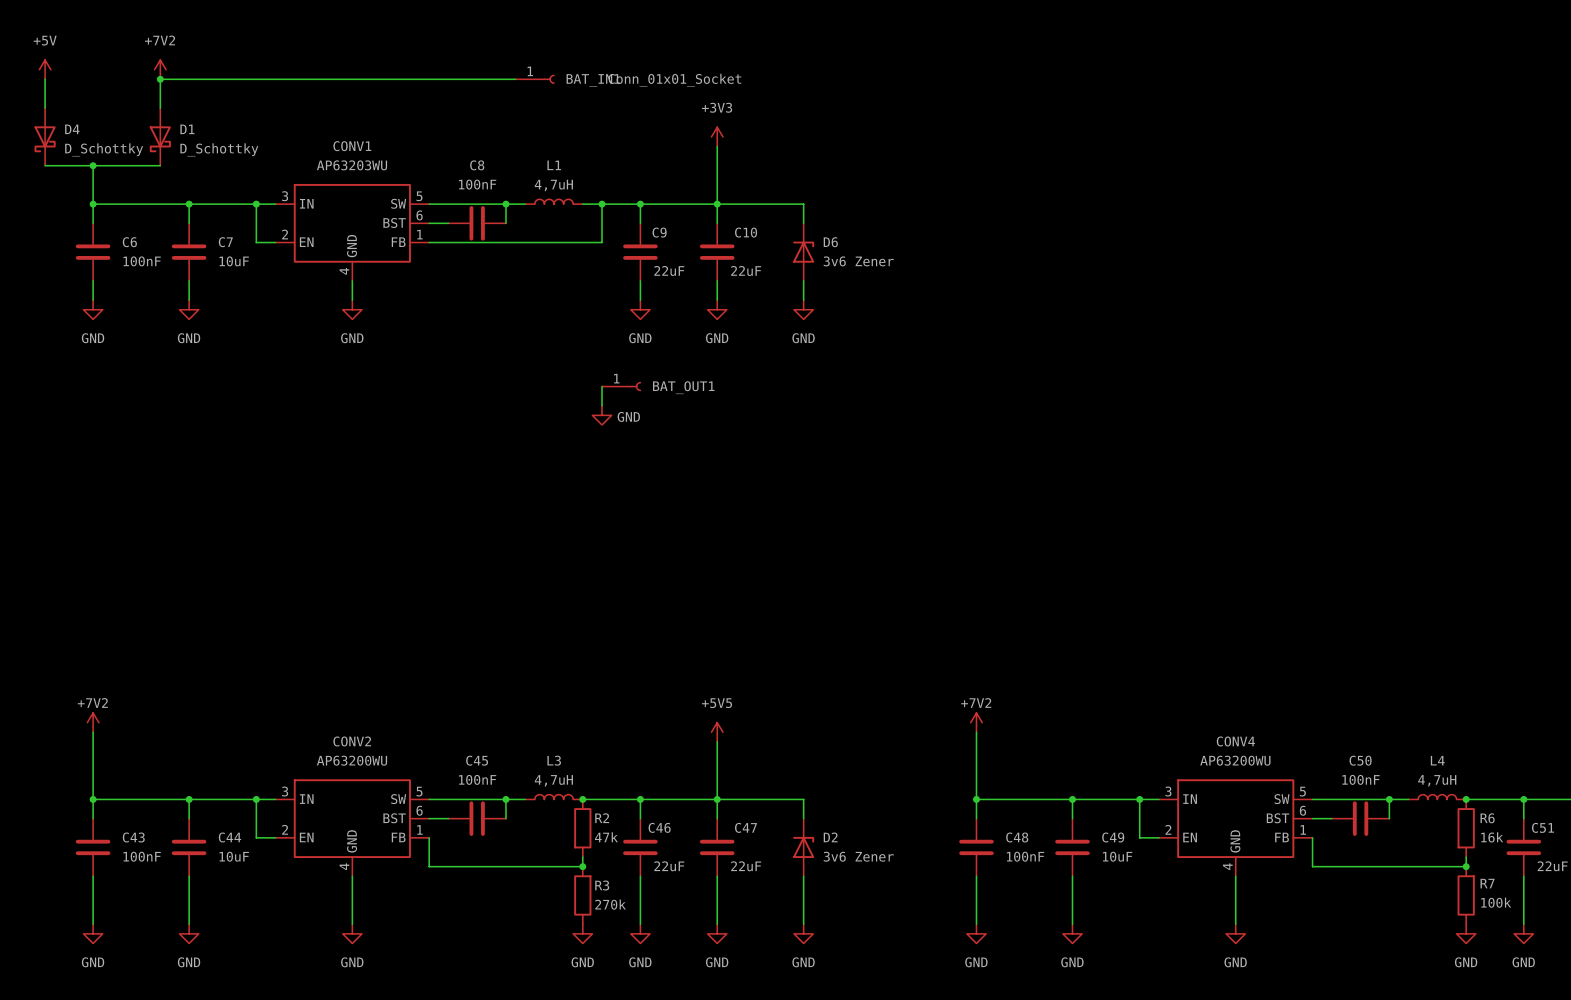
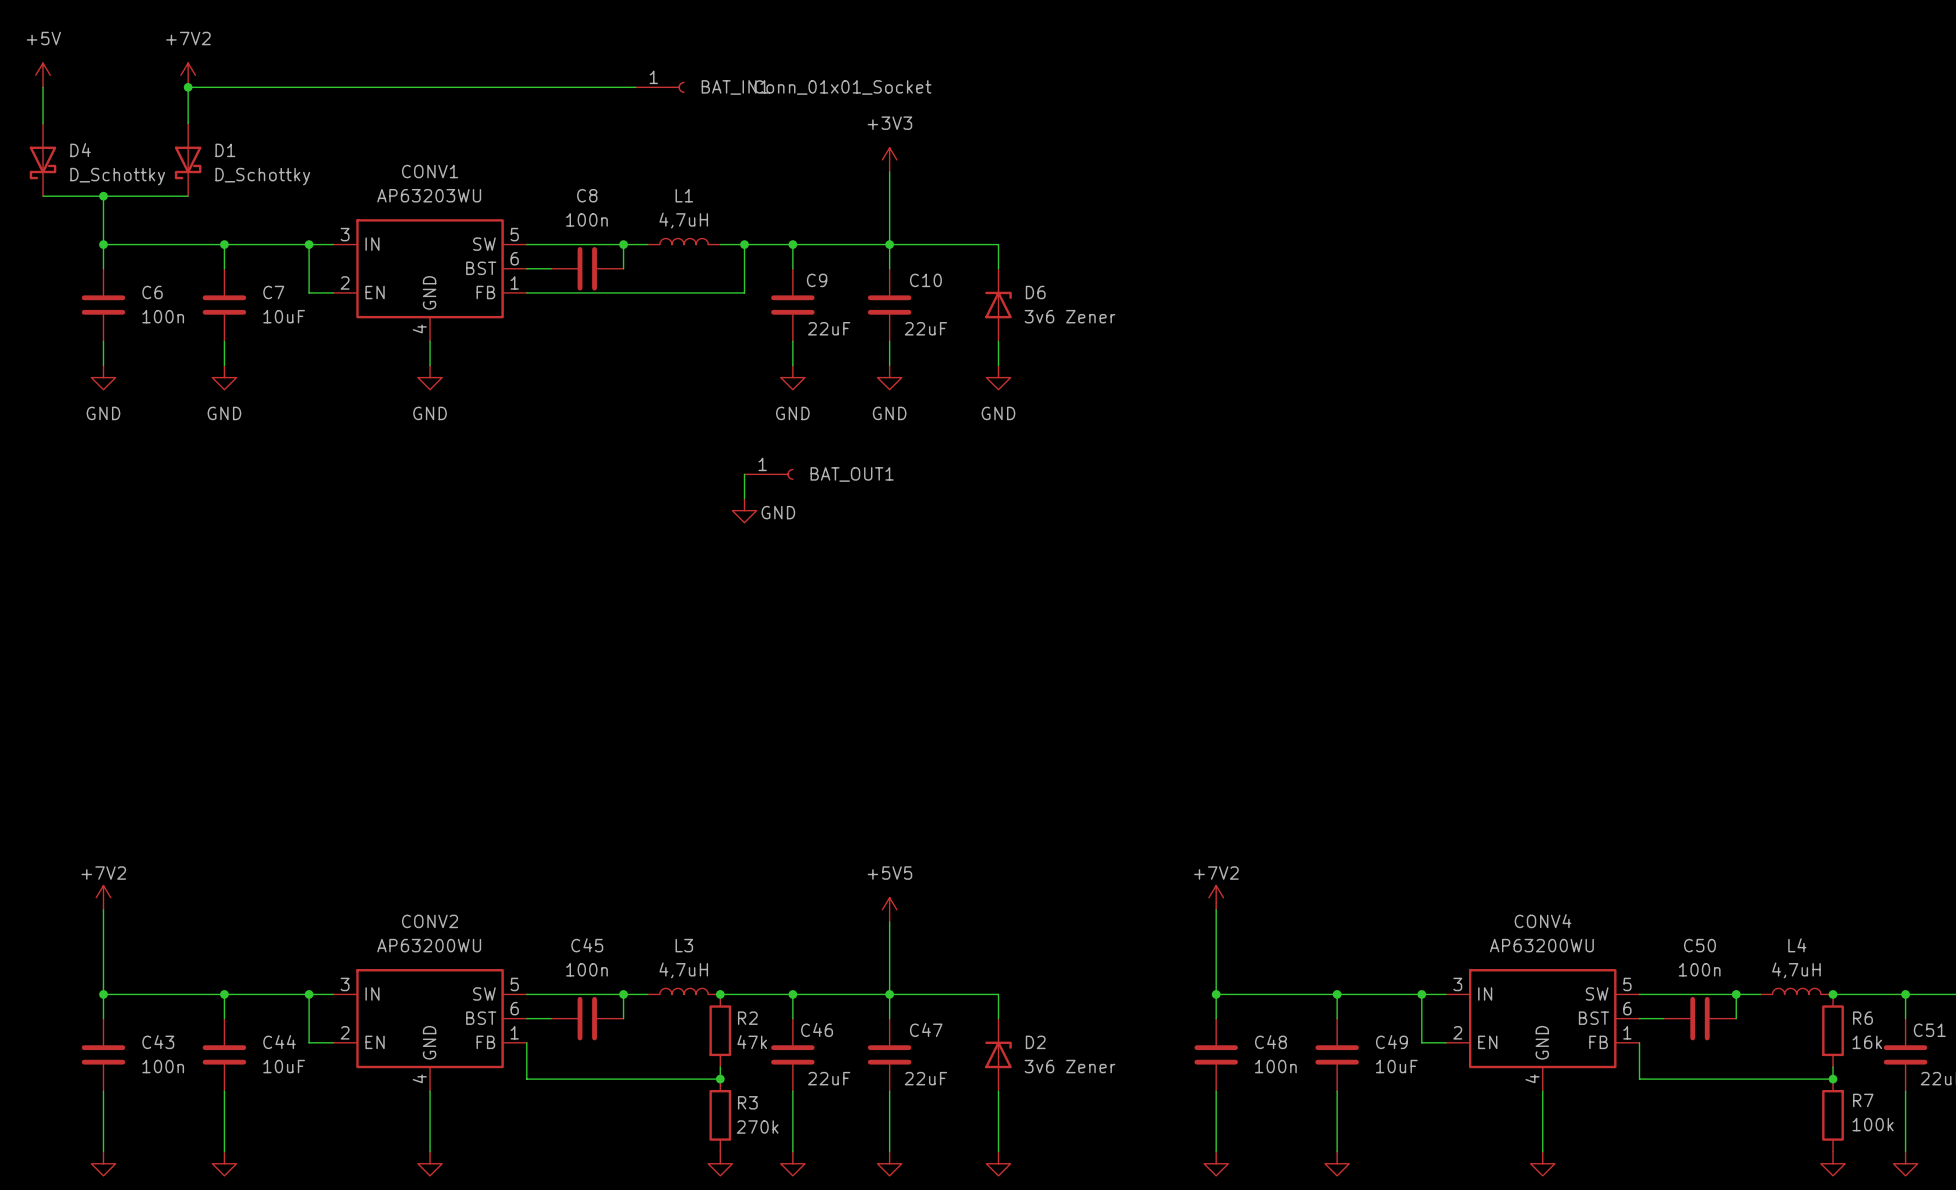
C8 value: 100nF (477, 184) -> 100n (586, 219)
C6 value: 100nF (142, 261) -> 100n (163, 316)
C45 value: 100nF (477, 779) -> 100n (586, 969)
C50 value: 100nF (1360, 779) -> 100n (1699, 969)
C43 value: 100nF (142, 856) -> 100n (163, 1066)
C48 value: 100nF (1025, 856) -> 100n (1275, 1066)

